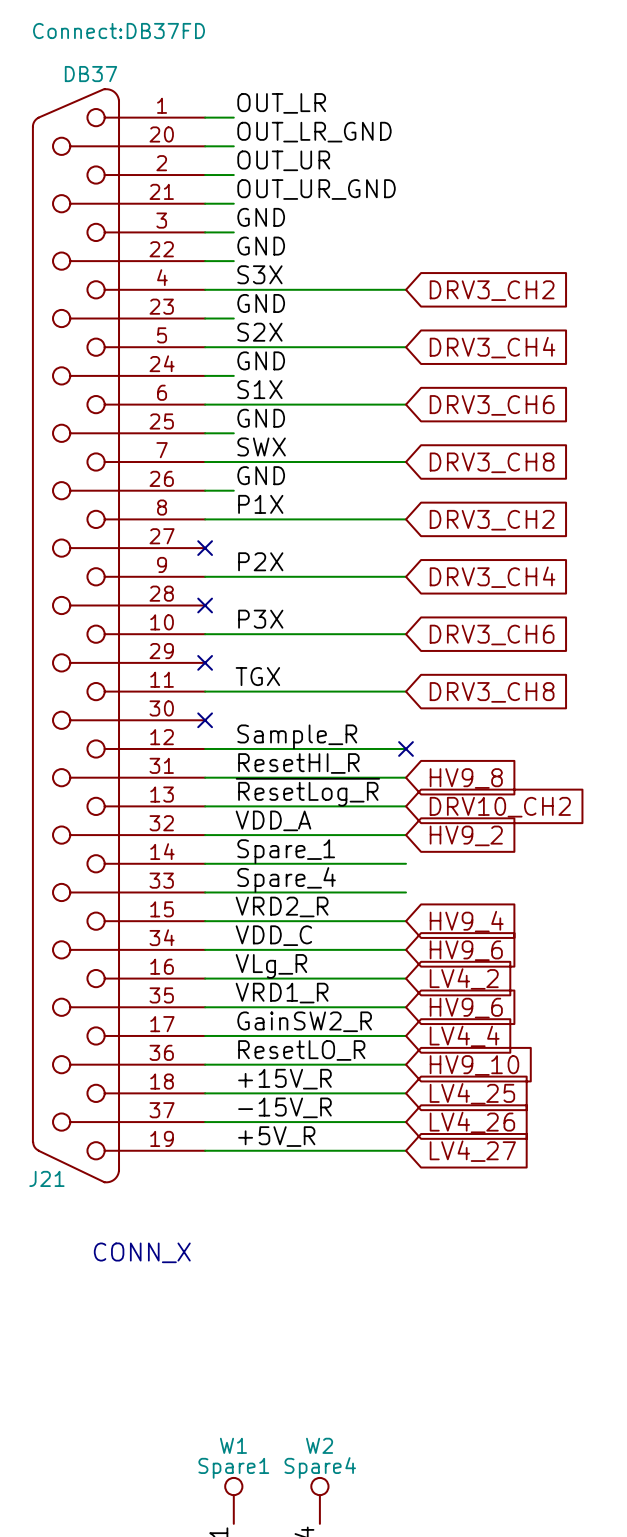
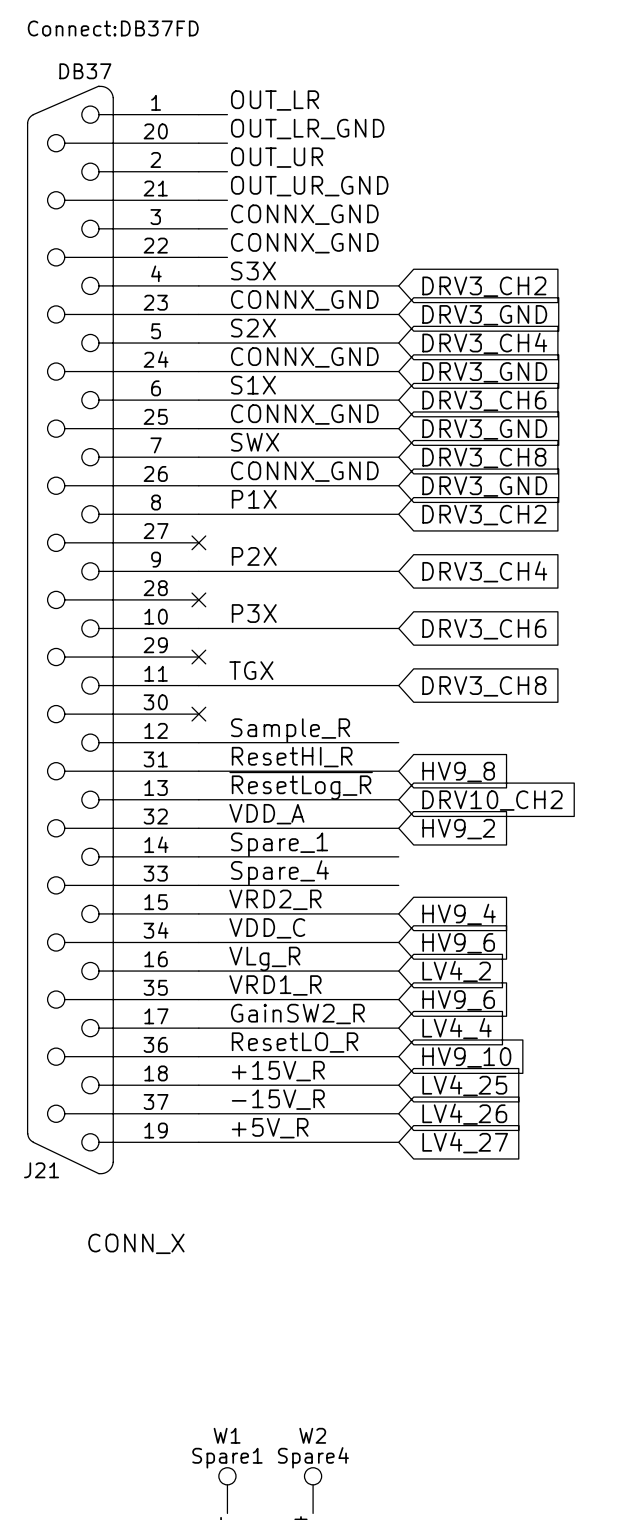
label: GND (261, 217) -> CONNX_GND (304, 214)
label: GND (261, 246) -> CONNX_GND (304, 243)
label: GND (261, 303) -> CONNX_GND (304, 300)
wire: none -> (227, 314) (398, 314)
global label: none -> DRV3_GND (484, 315)
label: GND (261, 360) -> CONNX_GND (304, 357)
wire: none -> (227, 371) (398, 371)
global label: none -> DRV3_GND (484, 372)
label: GND (261, 418) -> CONNX_GND (304, 414)
wire: none -> (227, 428) (398, 428)
global label: none -> DRV3_GND (484, 429)
label: GND (261, 475) -> CONNX_GND (304, 471)
wire: none -> (227, 485) (398, 485)
global label: none -> DRV3_GND (484, 486)
no-connect mark: (406, 748) -> none

